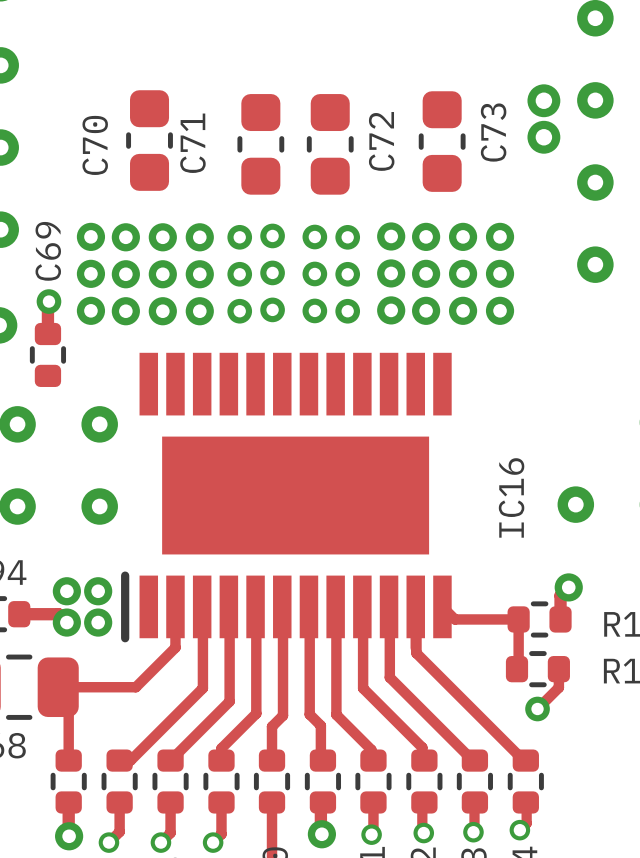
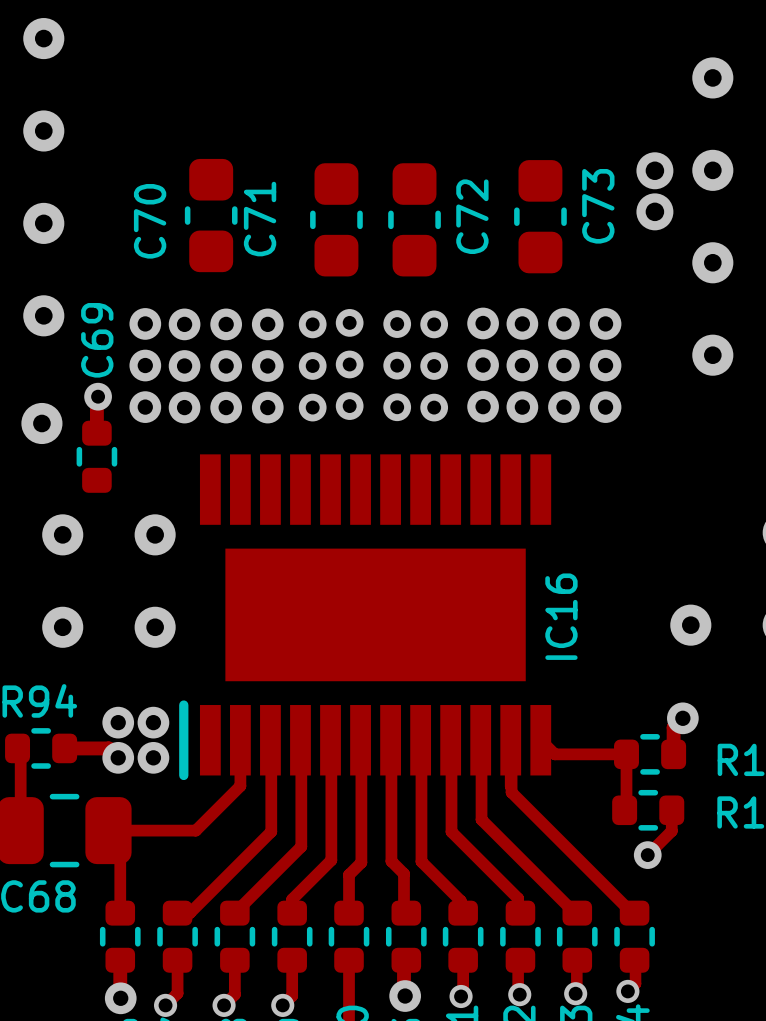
IC16 name position: IC16 (511, 497) -> IC16 (561, 616)

